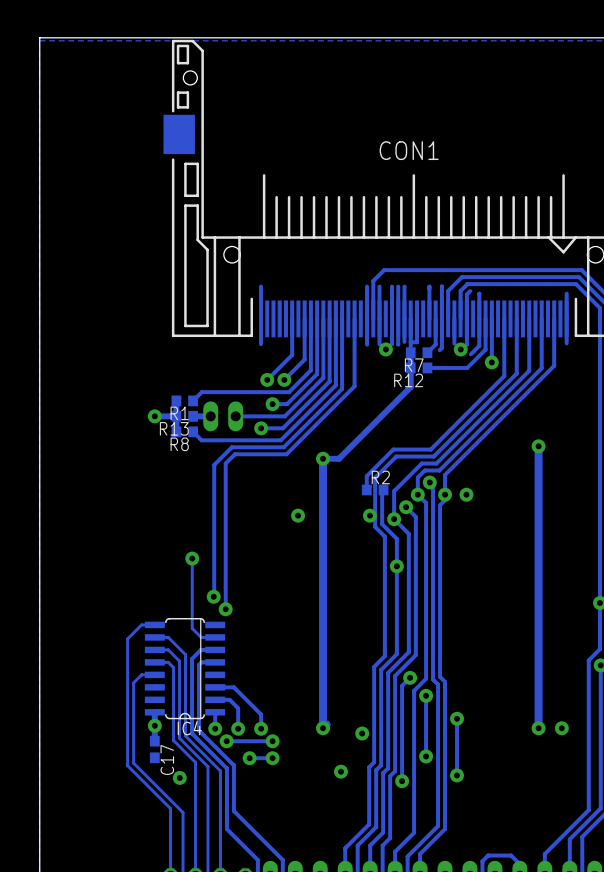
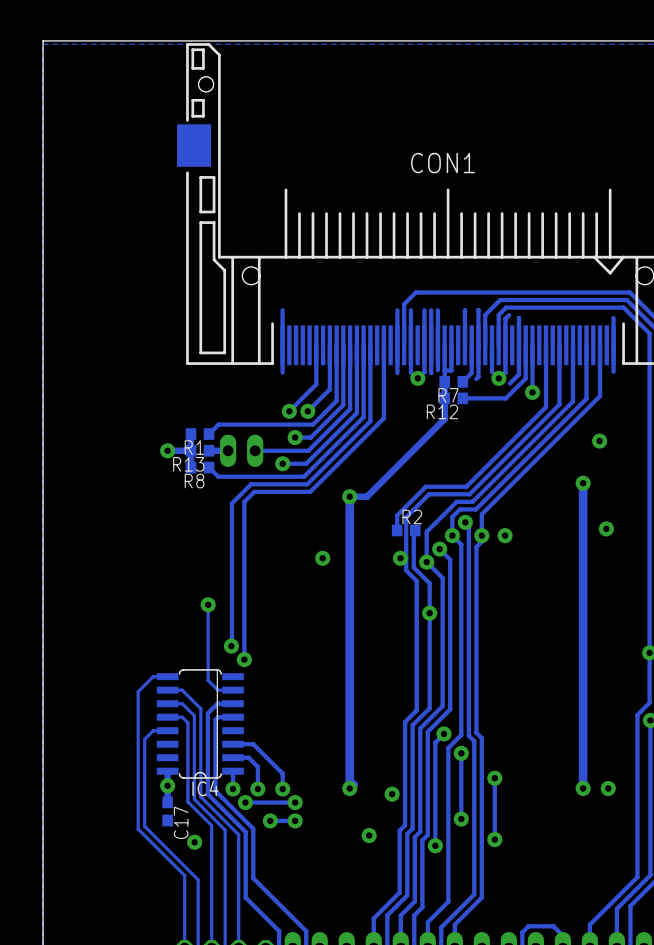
via: none -> (599, 441)
via: none -> (606, 528)

